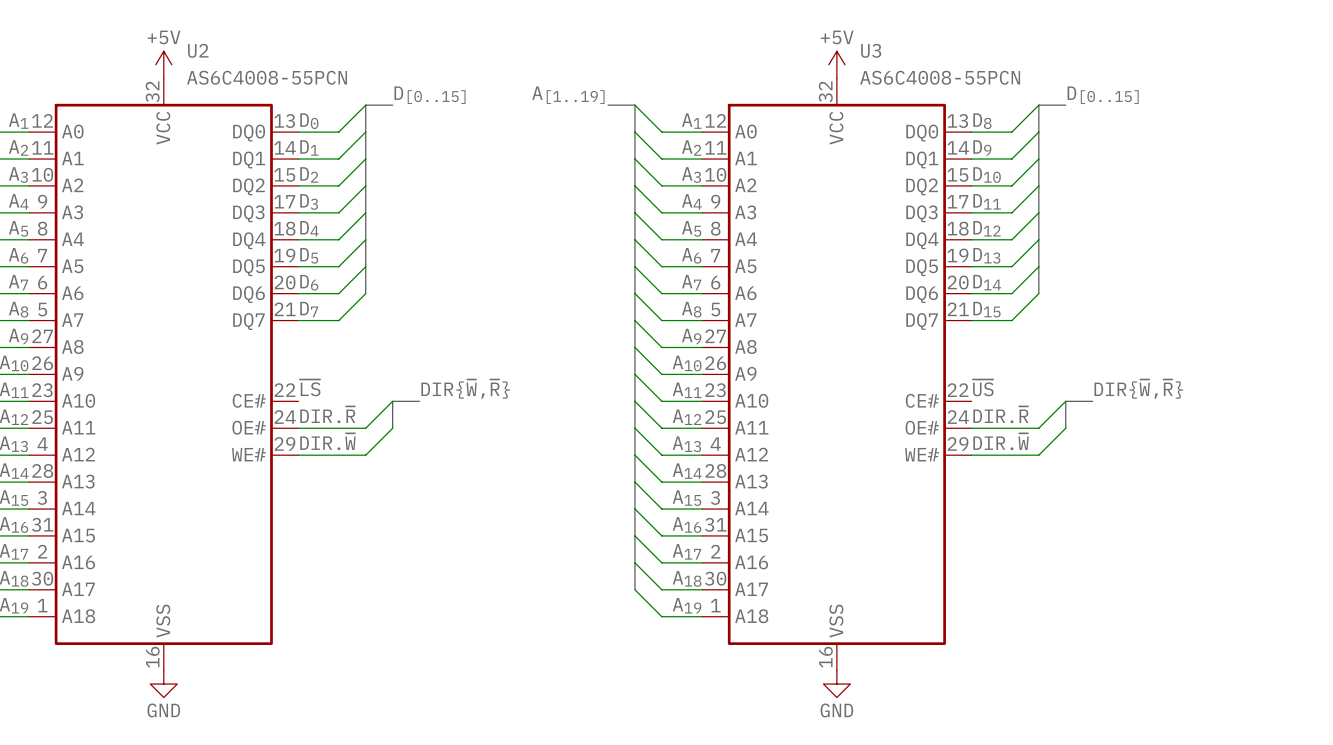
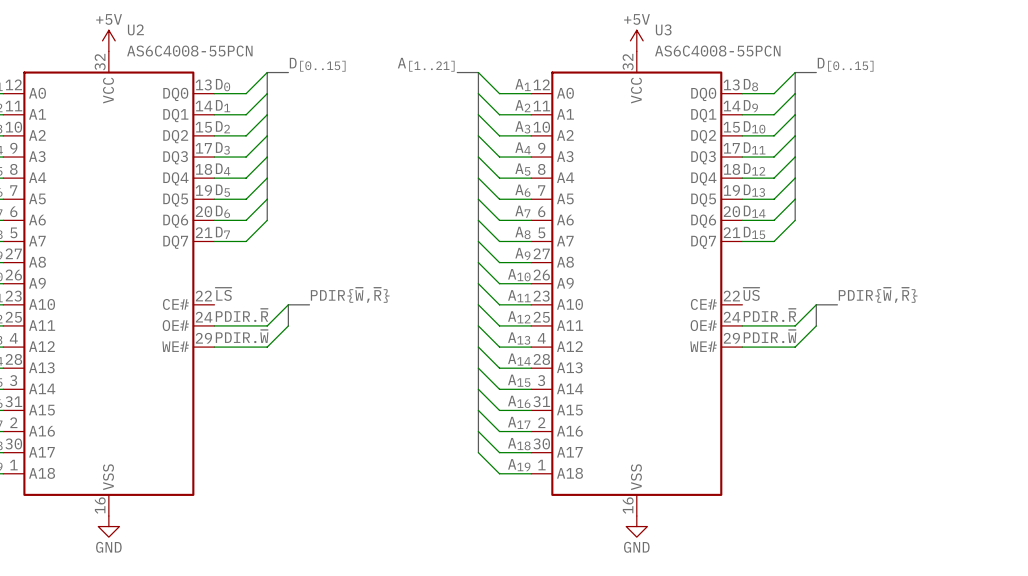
label: A[1..19] (568, 95) -> A[1..21] (426, 64)
label: DIR{~{W},~{R}} (465, 389) -> PDIR{~{W},~{R}} (350, 295)
label: DIR{~{W},~{R}} (1138, 389) -> PDIR{~{W},~{R}} (878, 295)
label: DIR.~{R} (327, 414) -> PDIR.~{R} (241, 315)
label: DIR.~{R} (1000, 414) -> PDIR.~{R} (769, 315)
label: DIR.~{W} (327, 441) -> PDIR.~{W} (242, 336)
label: DIR.~{W} (1001, 441) -> PDIR.~{W} (770, 336)

